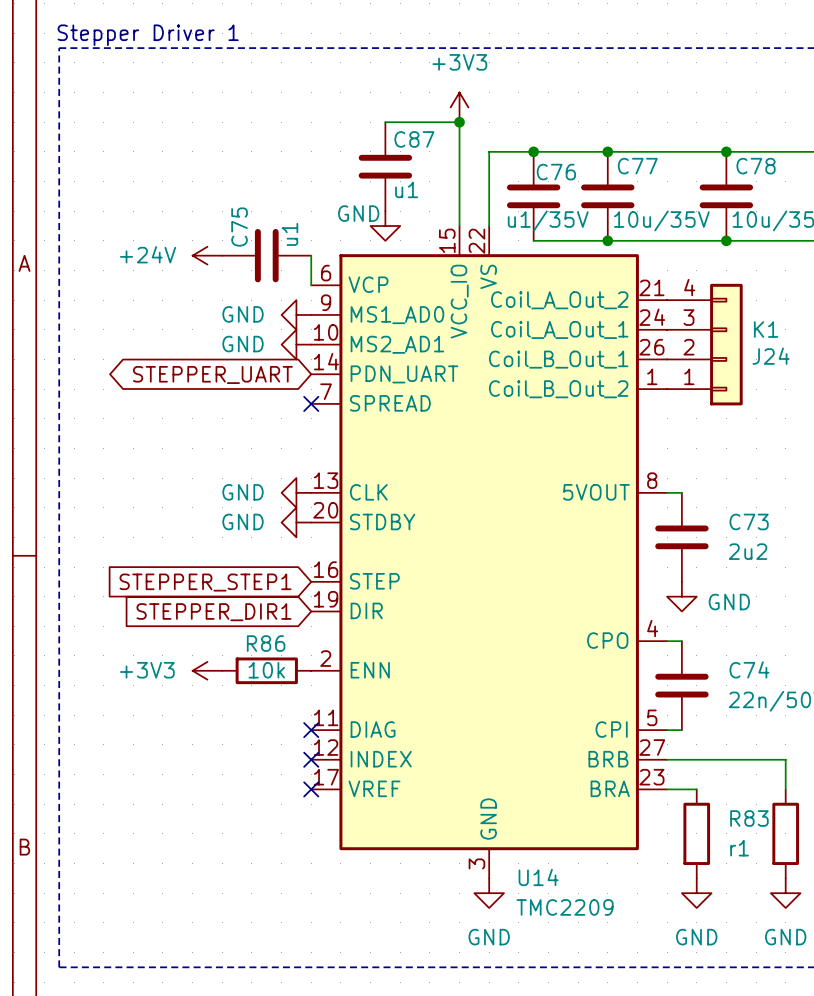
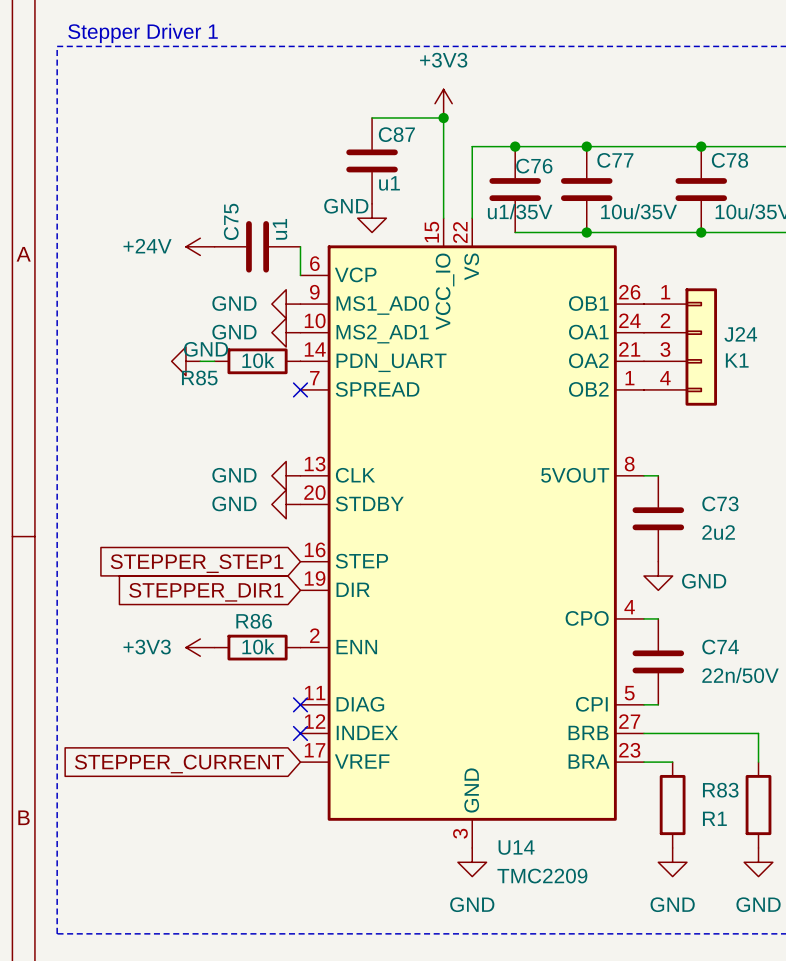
U14 symbol: [311, 226, 668, 879] -> [300, 218, 645, 848]
J24 flip: as is (726, 344) -> up-down (701, 347)
power symbol: none -> GND (185, 361)
global label: STEPPER_UART (212, 374) -> none
R85: none -> 10k (257, 361)
no-connect mark: (311, 789) -> none
global label: none -> STEPPER_CURRENT (179, 764)
R83 value: r1 (739, 848) -> R1 (714, 818)

